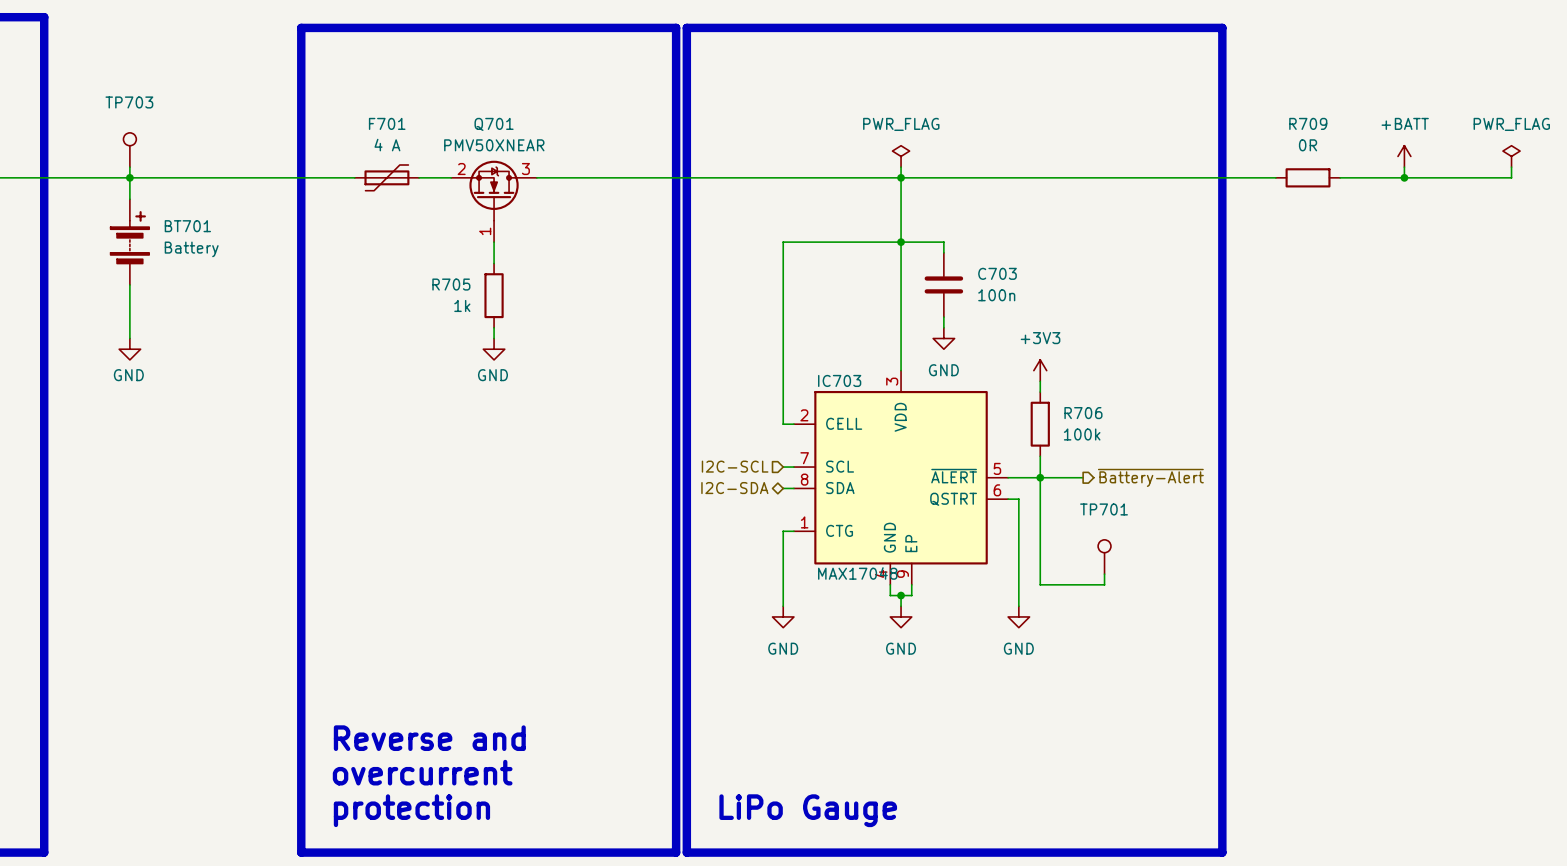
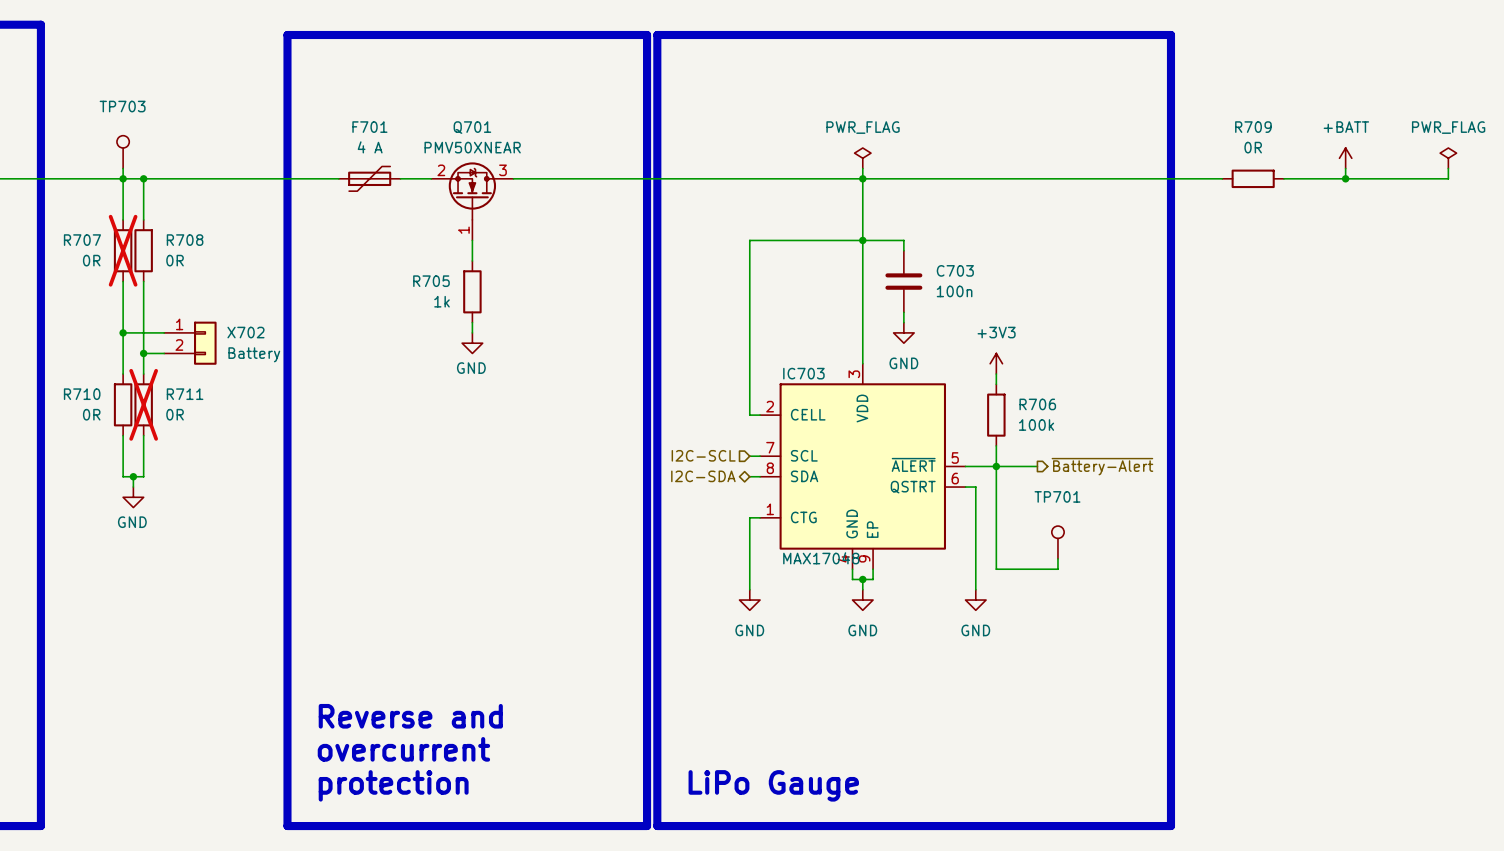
wire: none -> (143, 178) (143, 219)
junction: none -> (143, 178)
BT701: Battery (129, 242) -> none
R707: none -> 0R (123, 250)
R708: none -> 0R (143, 250)
wire: none -> (143, 281) (143, 374)
junction: none -> (123, 332)
wire: none -> (164, 332) (123, 332) (123, 374)
power symbol position: GND (129, 349) -> GND (133, 497)
X702: none -> Battery (190, 343)
wire: none -> (143, 353) (164, 353)
junction: none -> (143, 353)
R710: none -> 0R (123, 404)
R711: none -> 0R (143, 404)
wire: none -> (123, 435) (123, 476) (143, 476) (143, 435)
wire: none -> (133, 476) (133, 487)
junction: none -> (133, 476)

